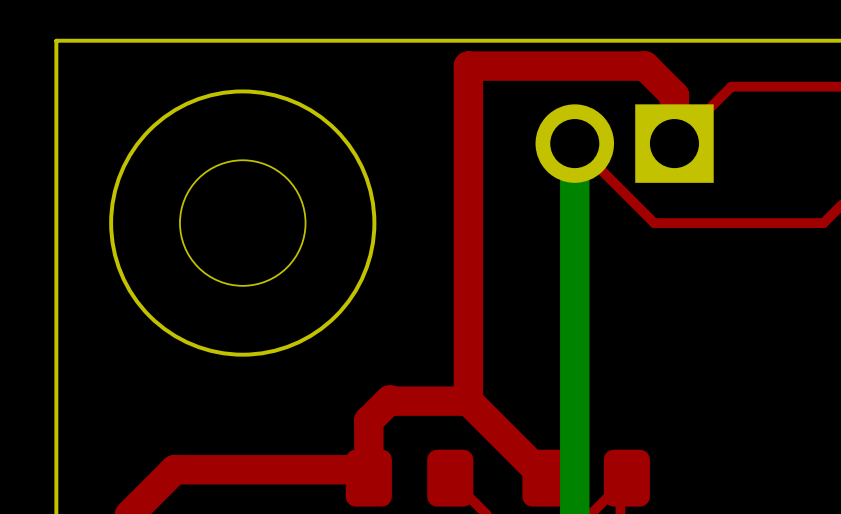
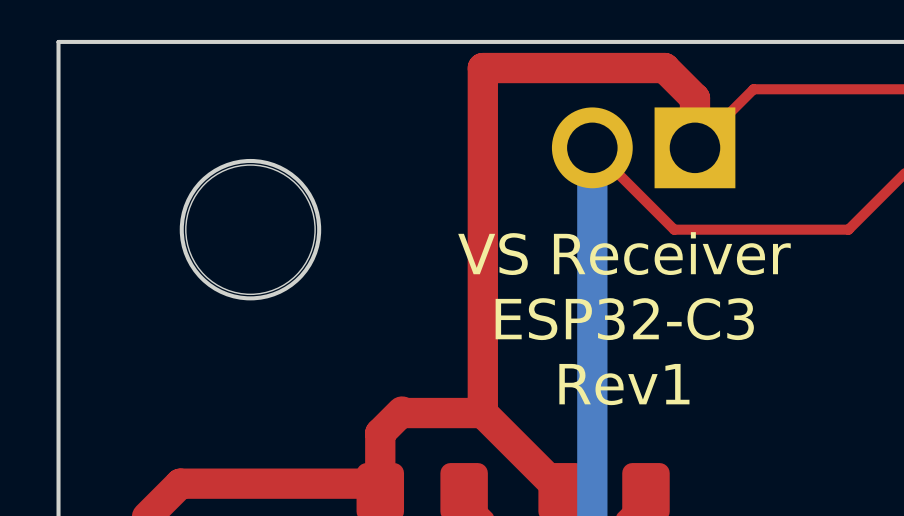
round board edge size: [109, 89, 377, 357] -> [179, 158, 322, 301]
text: none -> VS Receiver (624, 253)
text: none -> ESP32-C3 (624, 319)
text: none -> Rev1 (624, 384)

